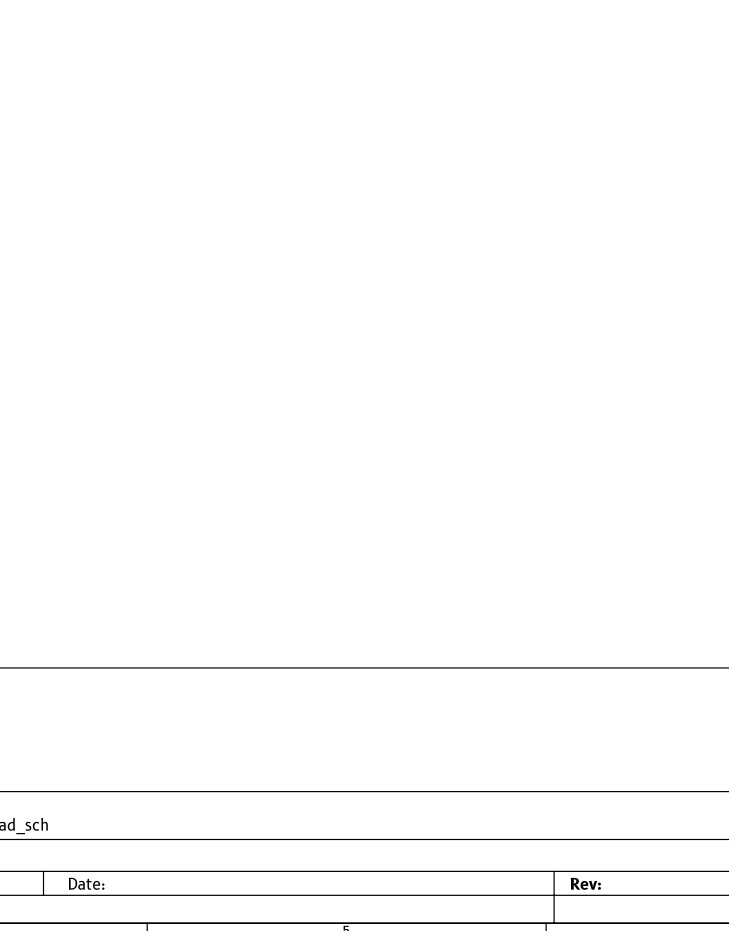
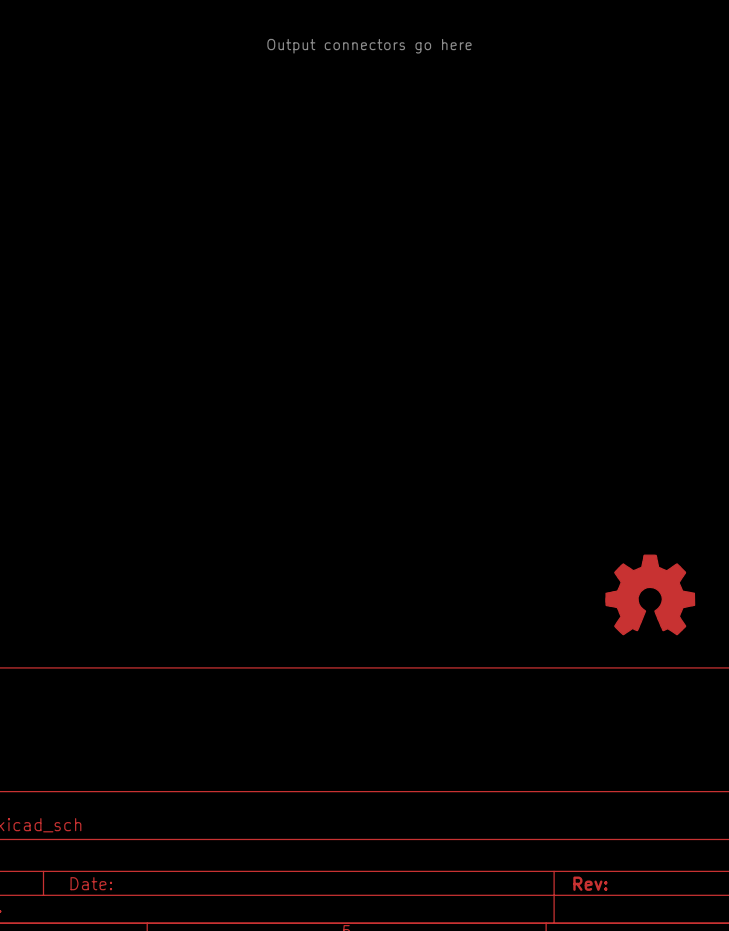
text: none -> Output connectors go here (369, 46)
part: none -> (650, 594)

